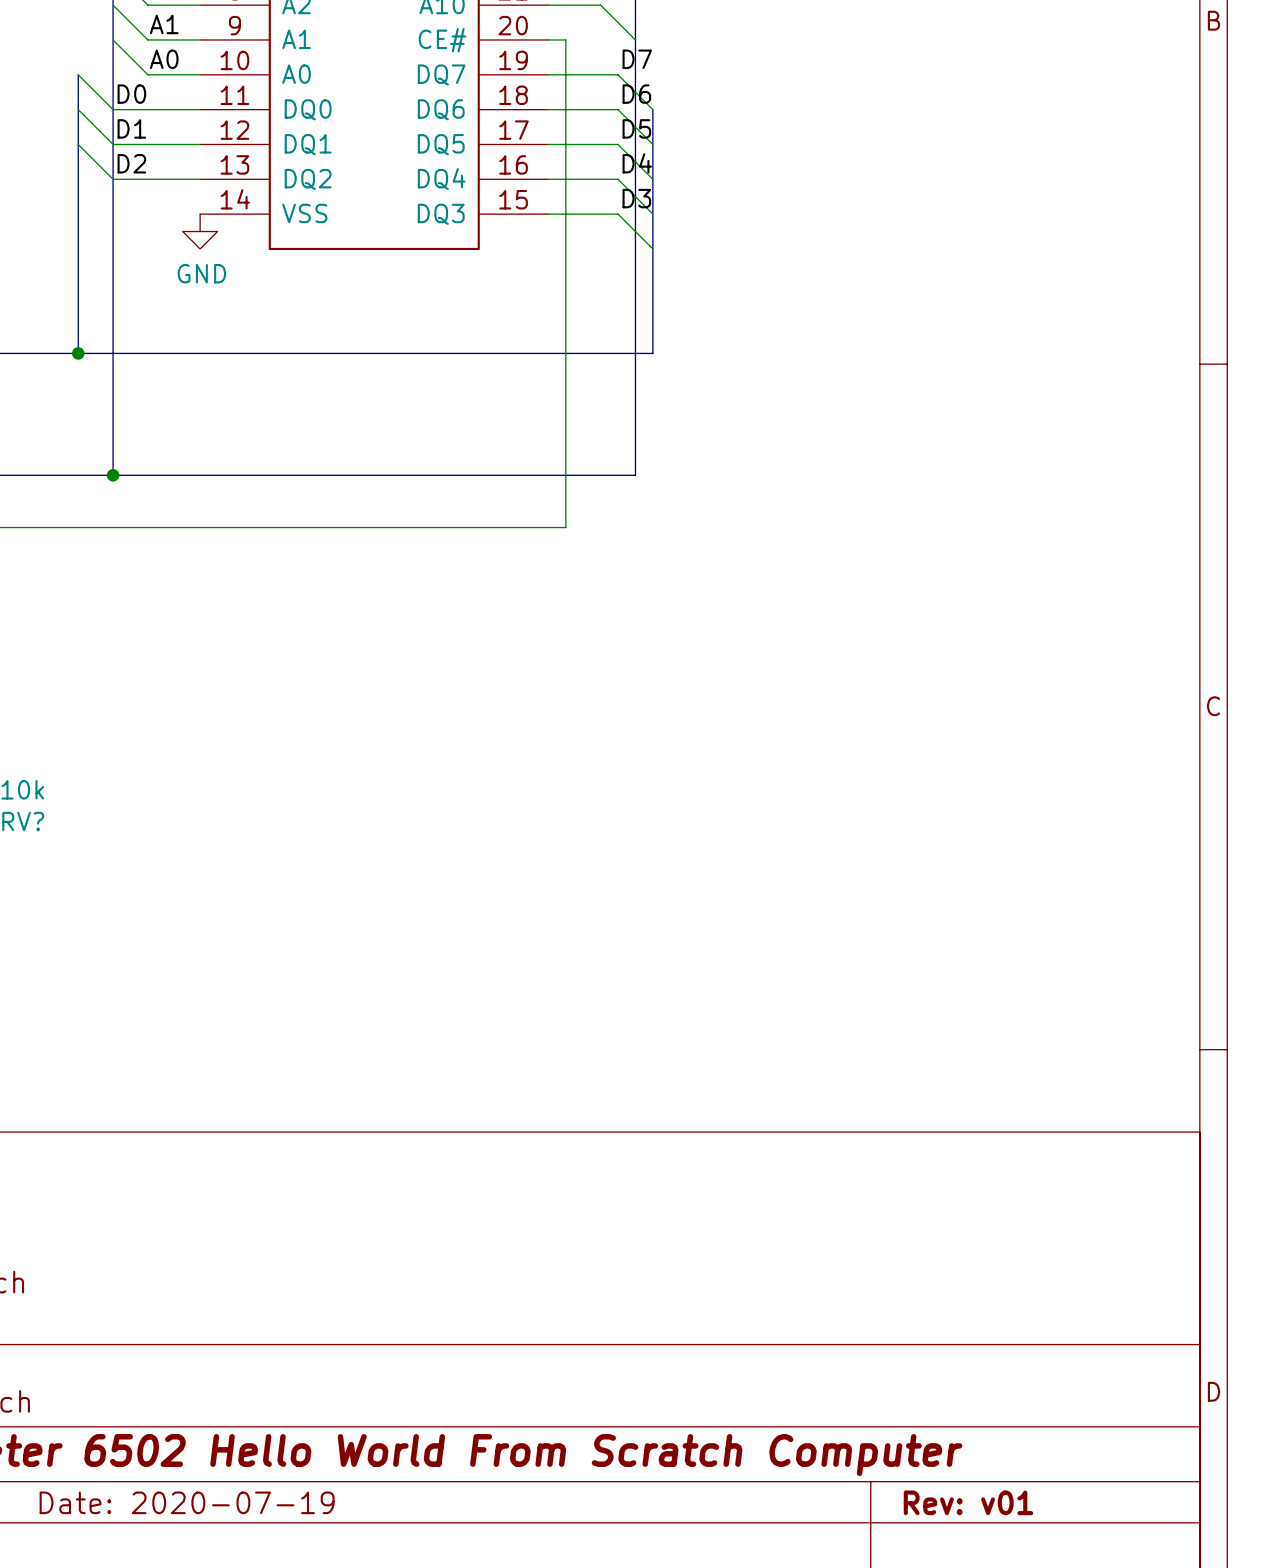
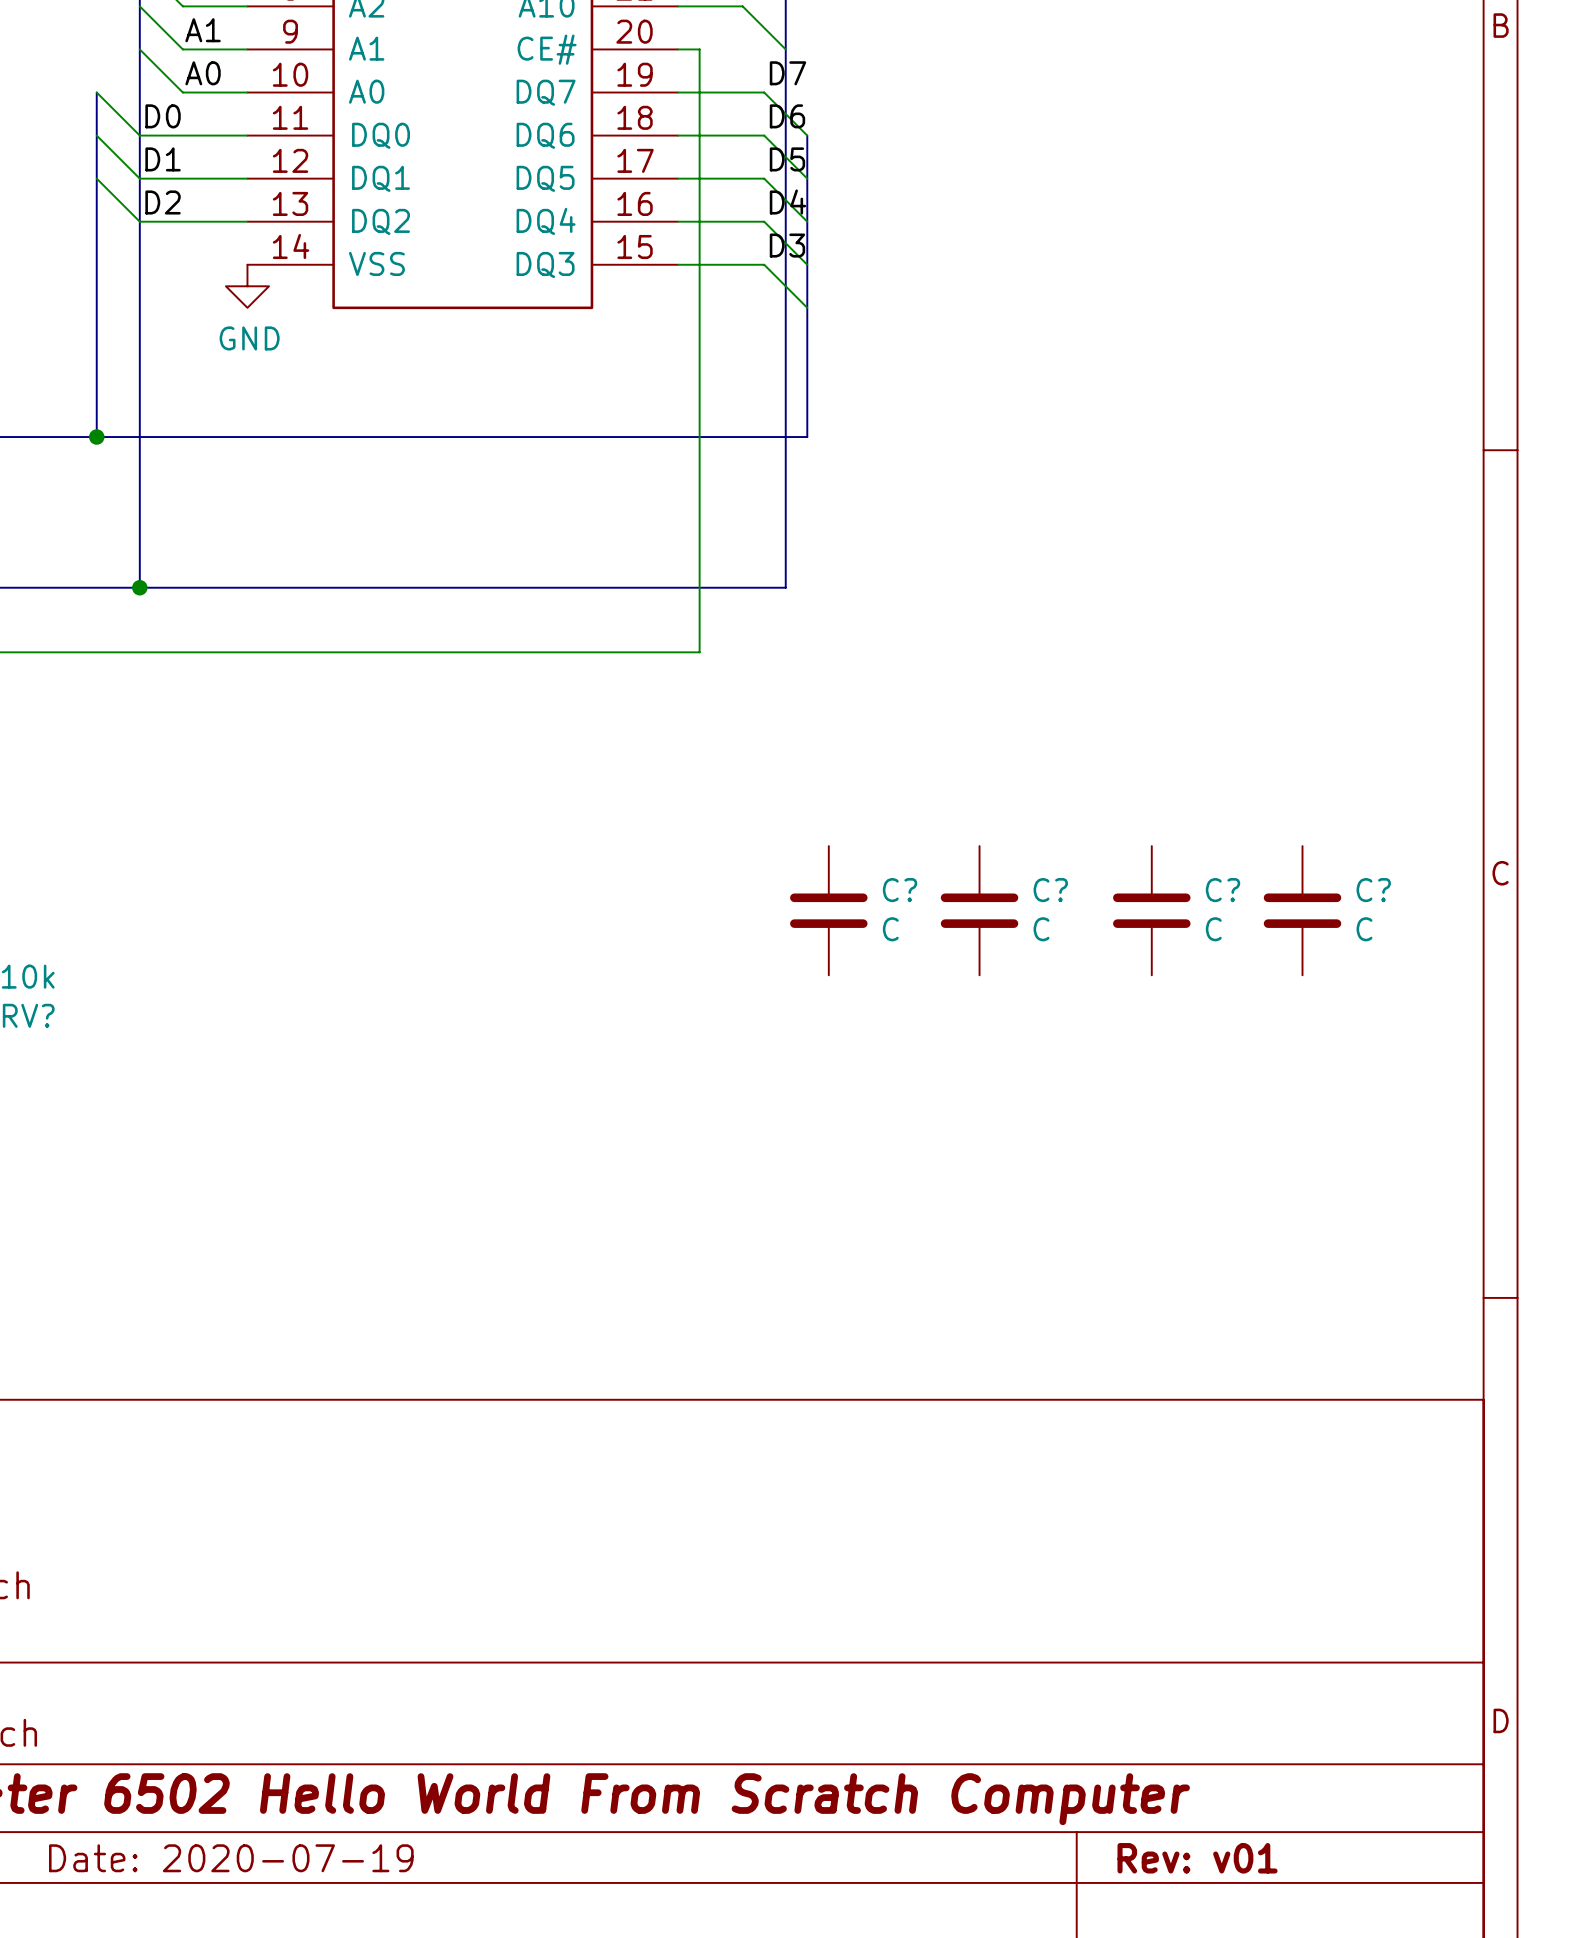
C?: none -> C (828, 910)
C?: none -> C (979, 910)
C?: none -> C (1151, 910)
C?: none -> C (1302, 910)

